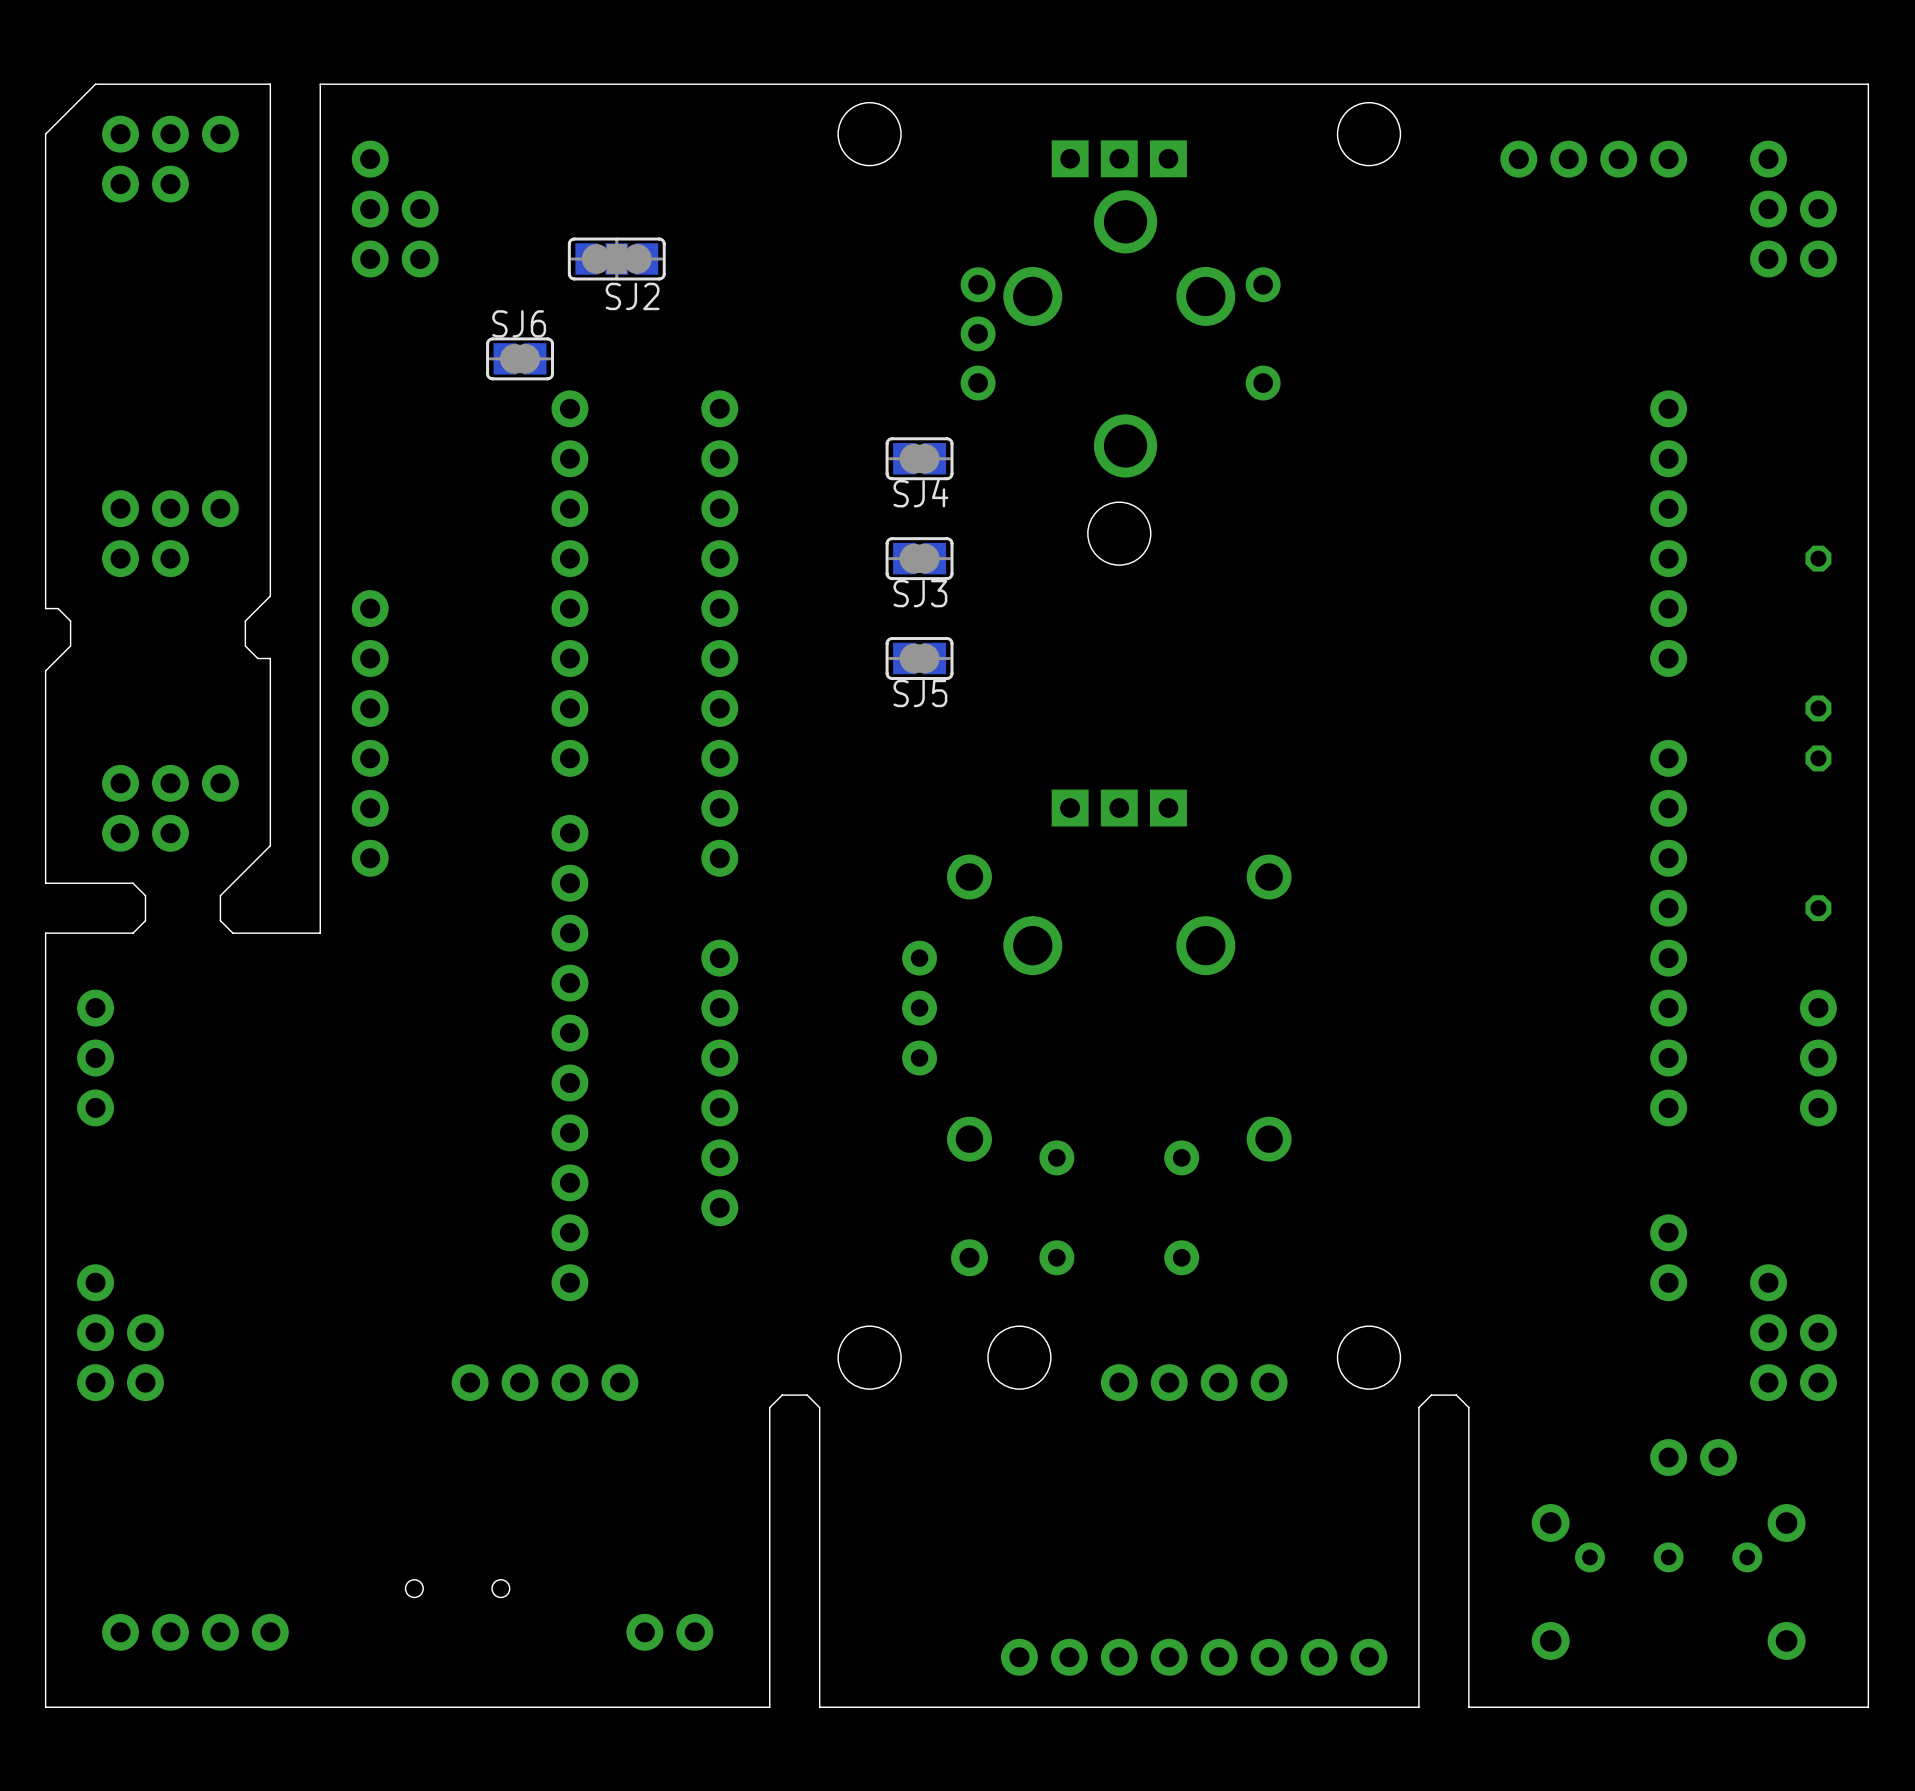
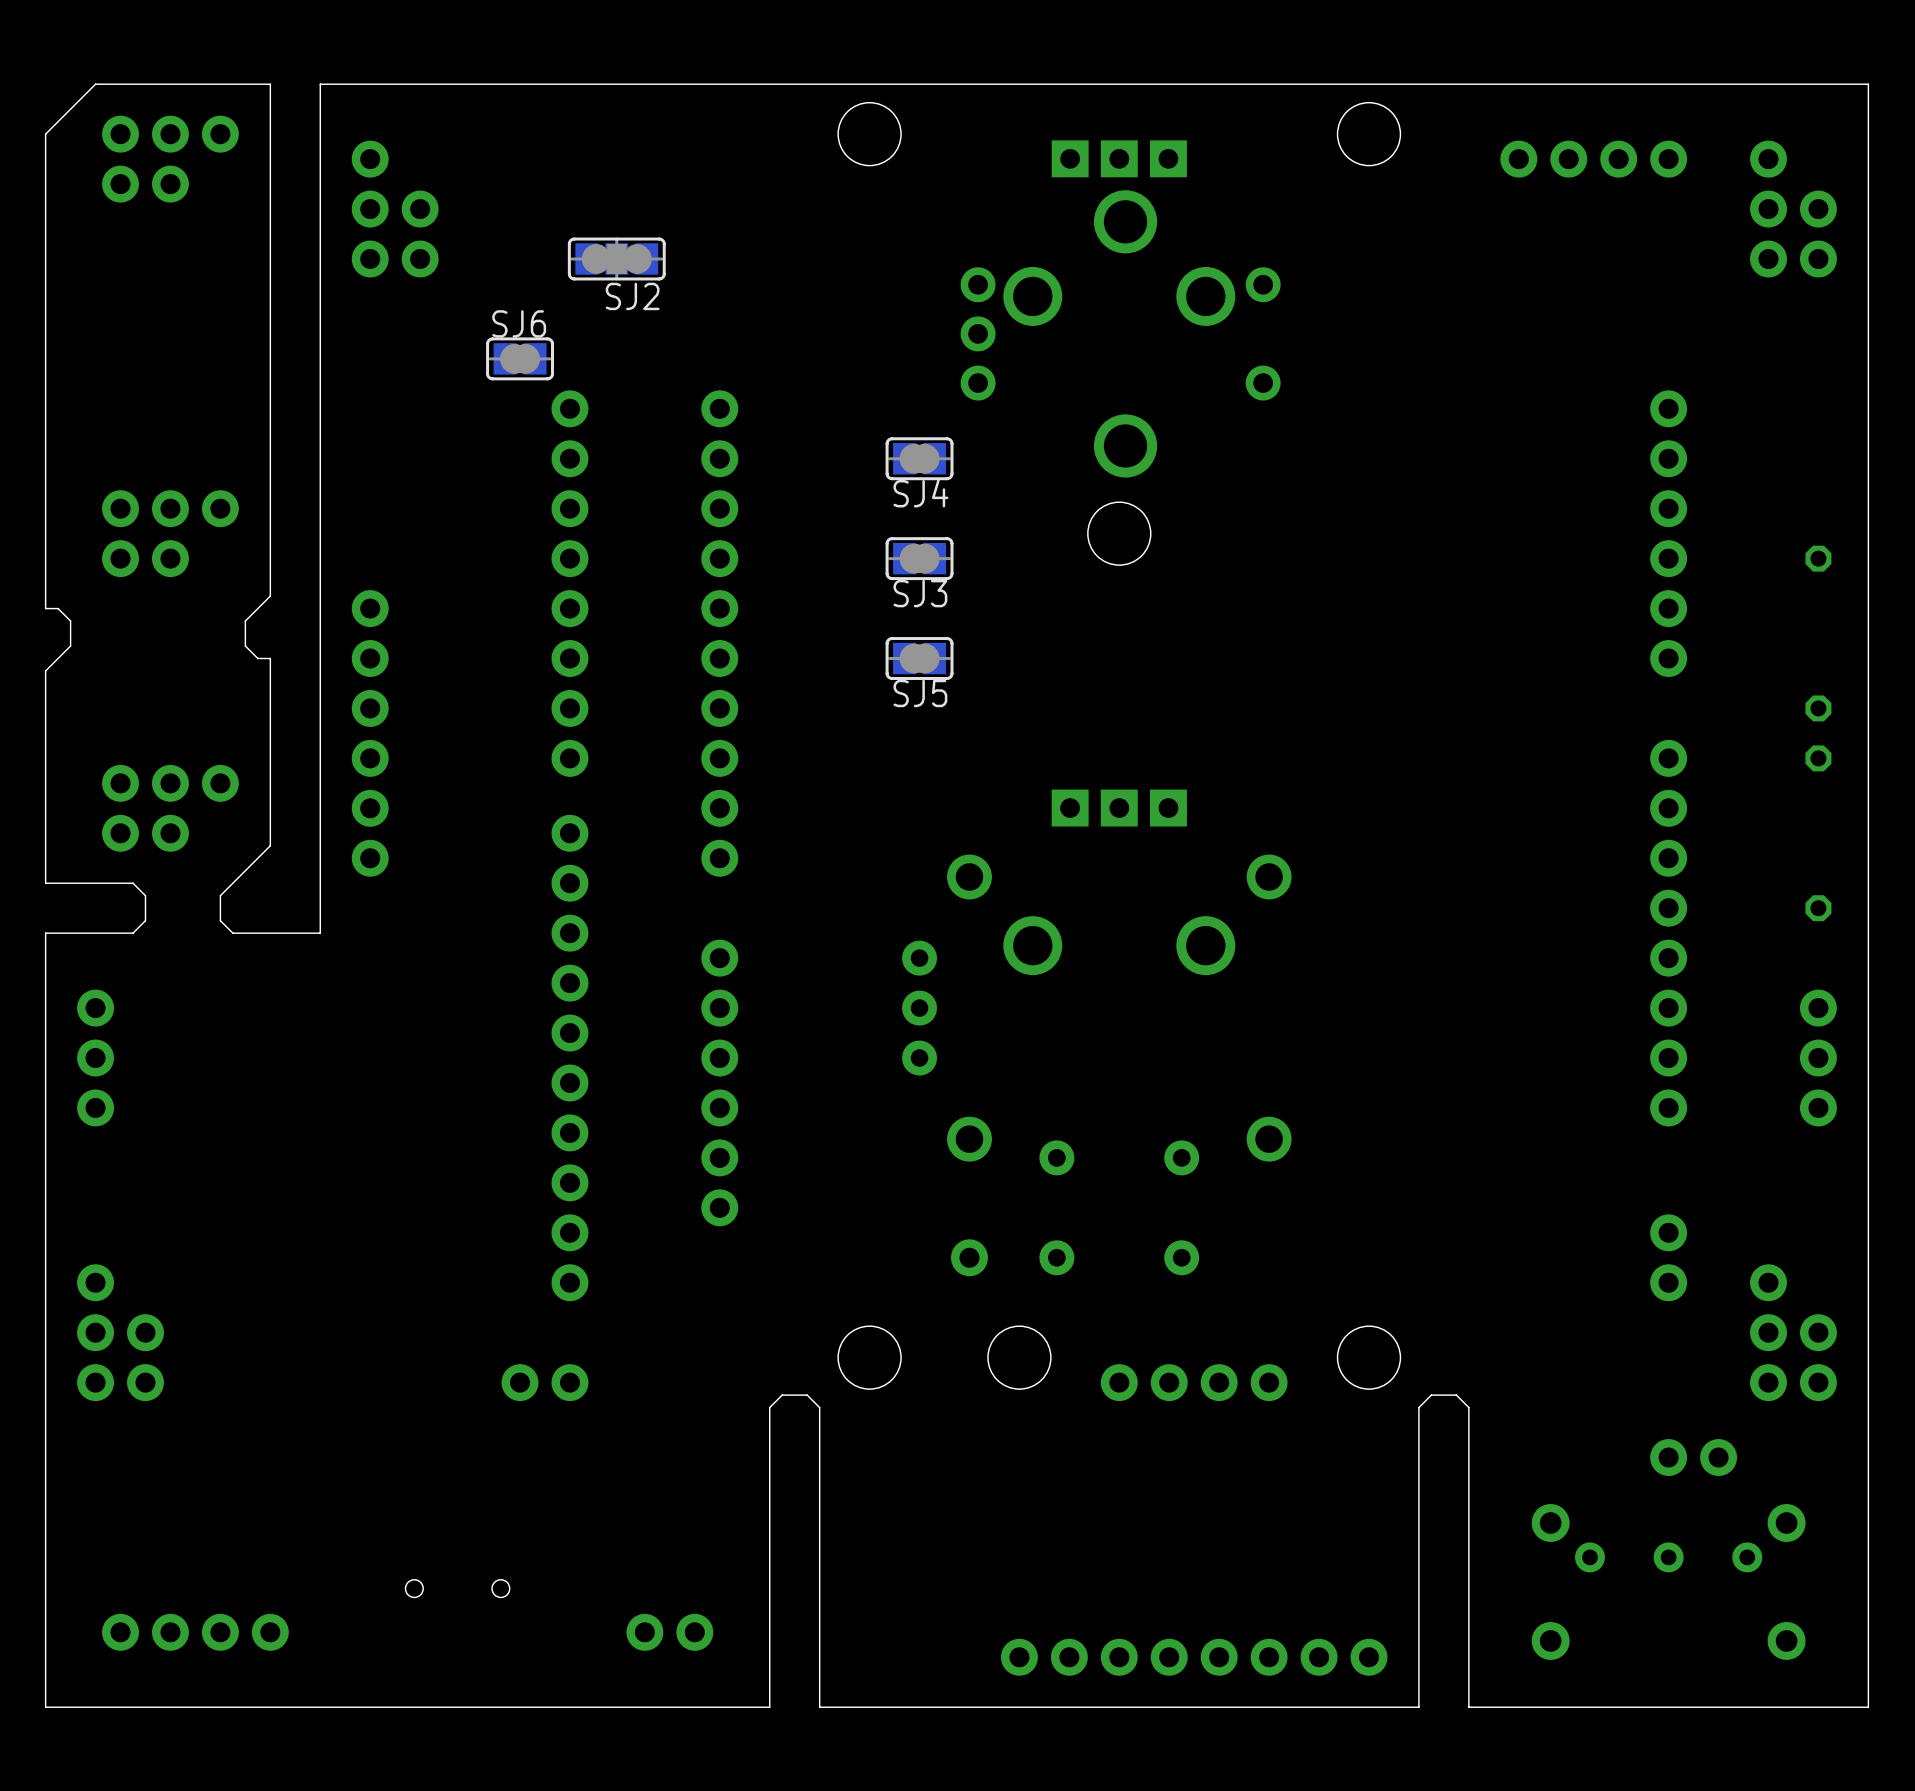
part footprint: [451, 1364, 639, 1402] -> [501, 1364, 589, 1402]

